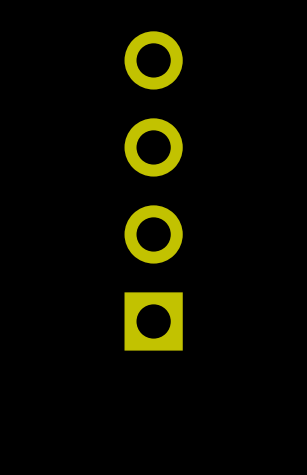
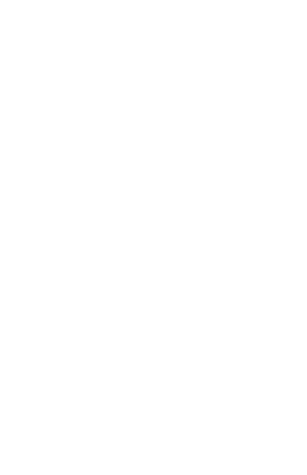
part: (153, 190) -> none

